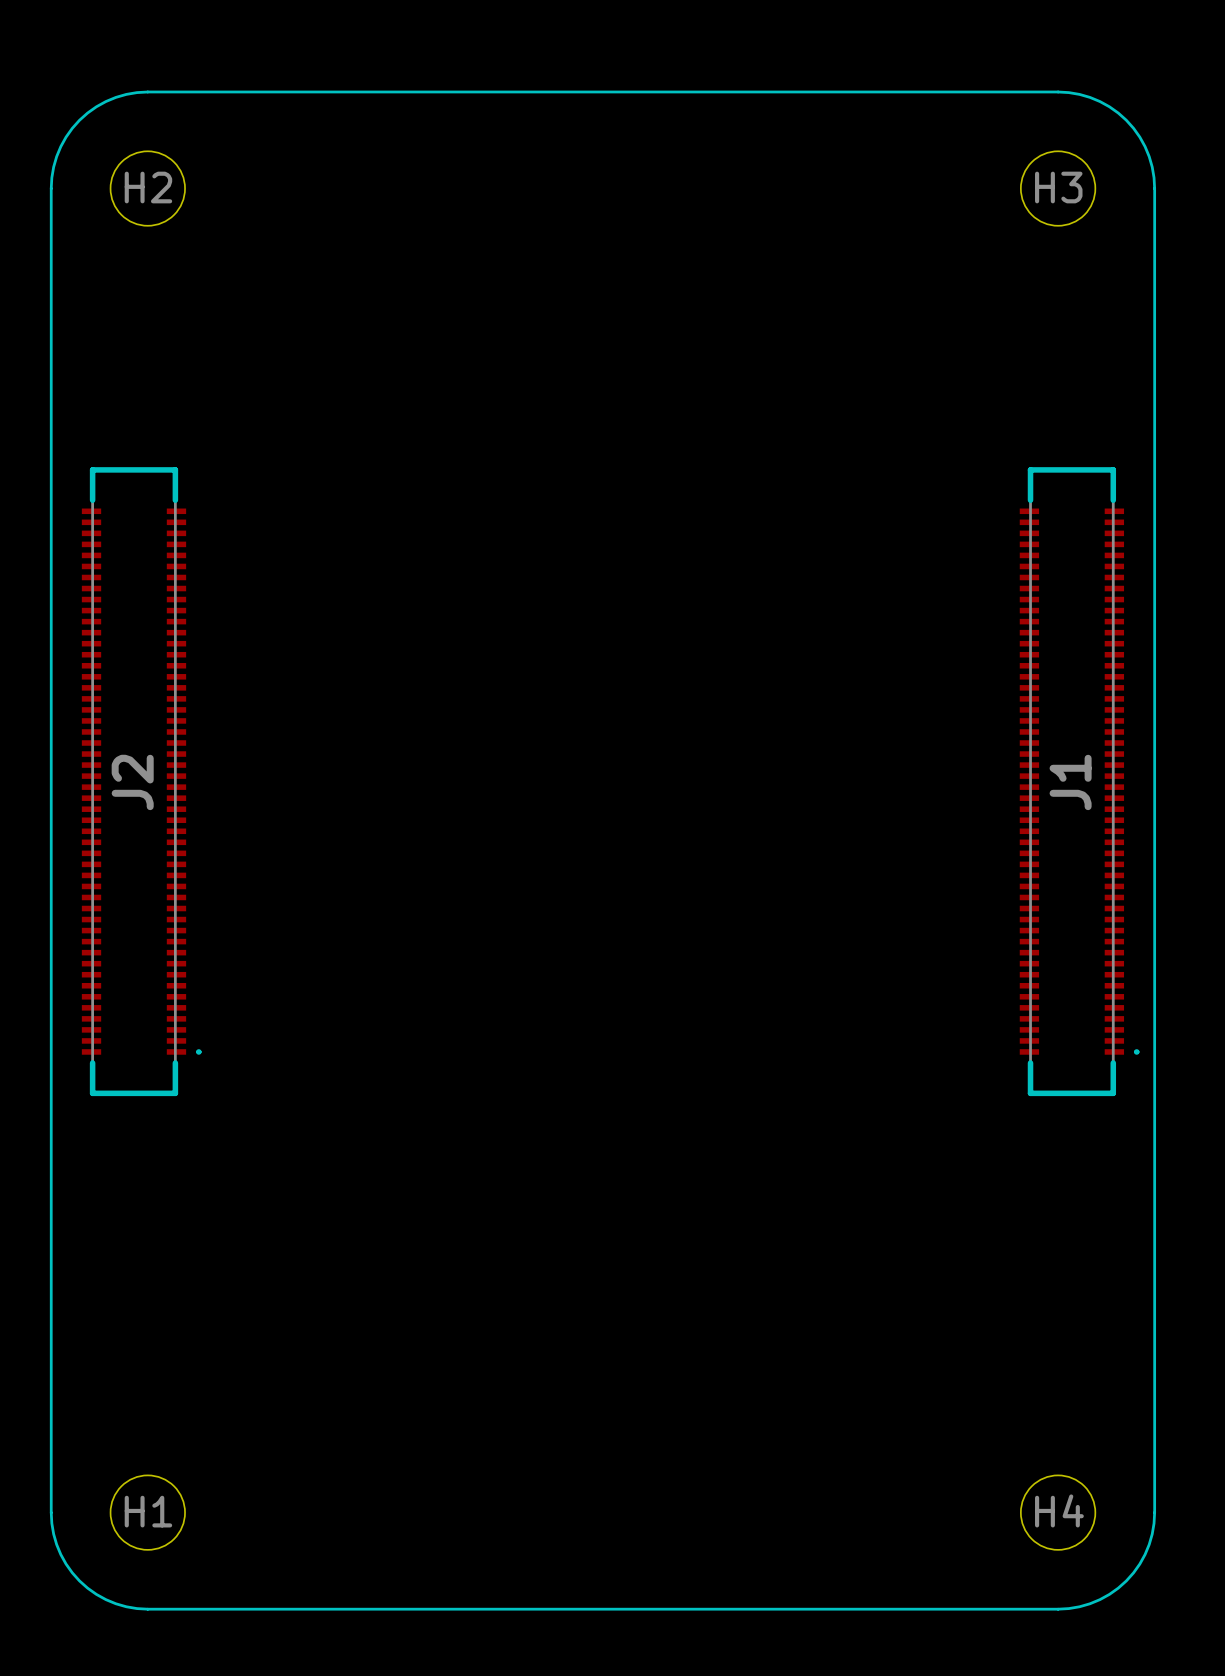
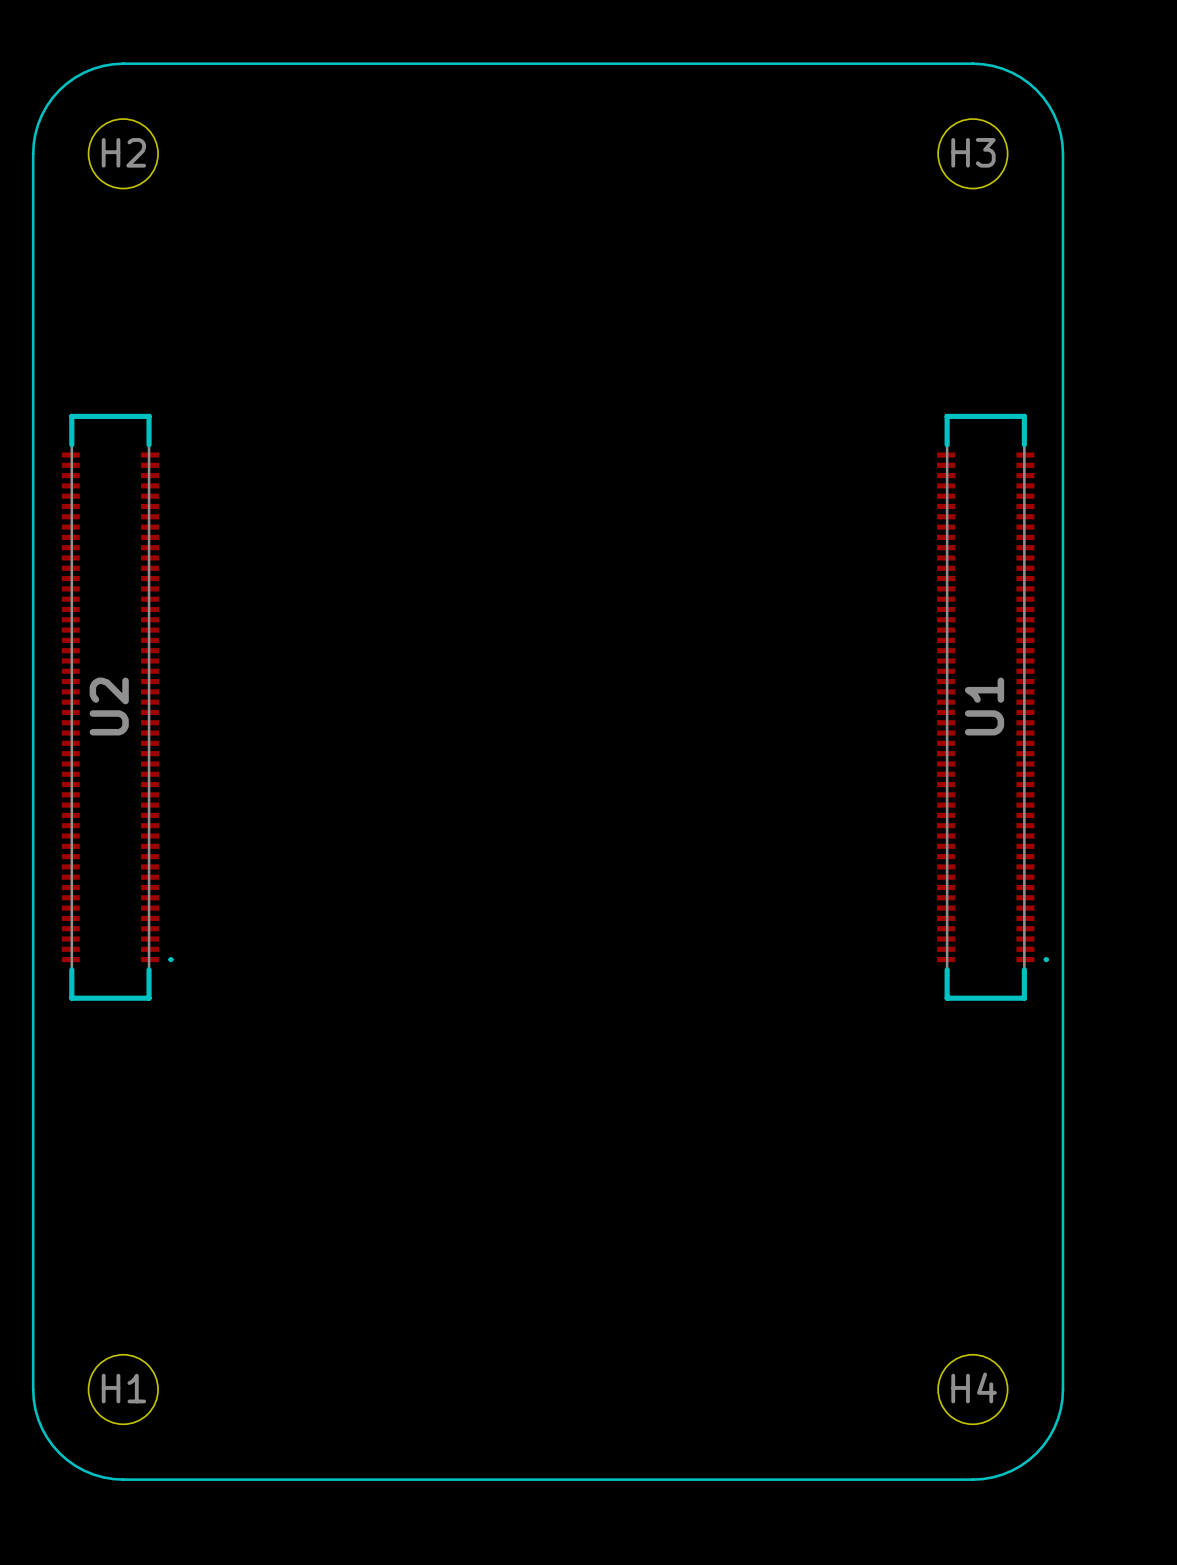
J2 name: J2 (132, 782) -> U2 (109, 706)
J1 name: J1 (1070, 782) -> U1 (984, 706)

